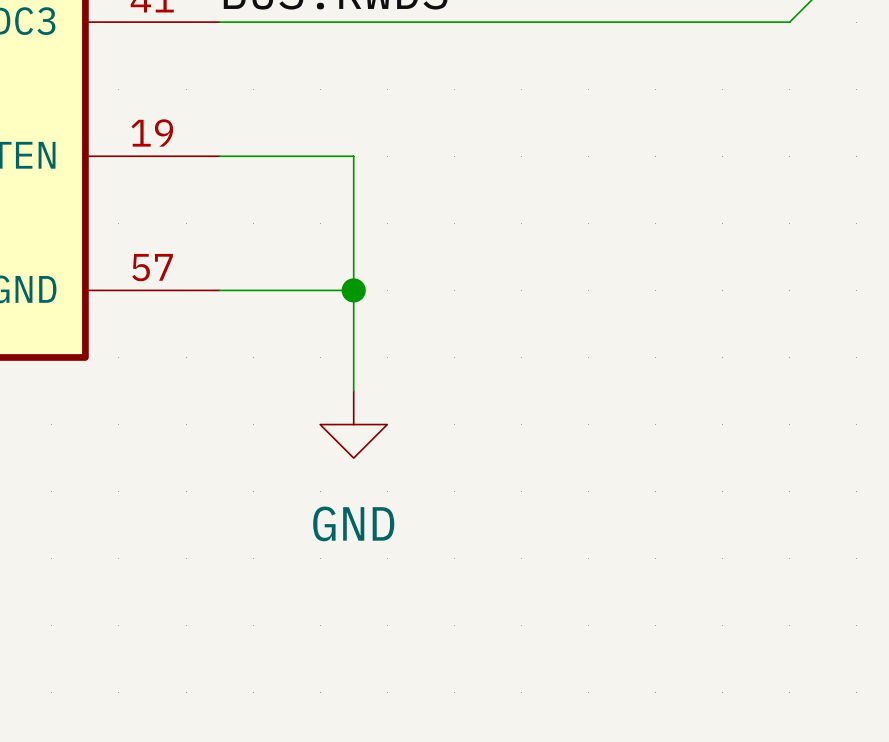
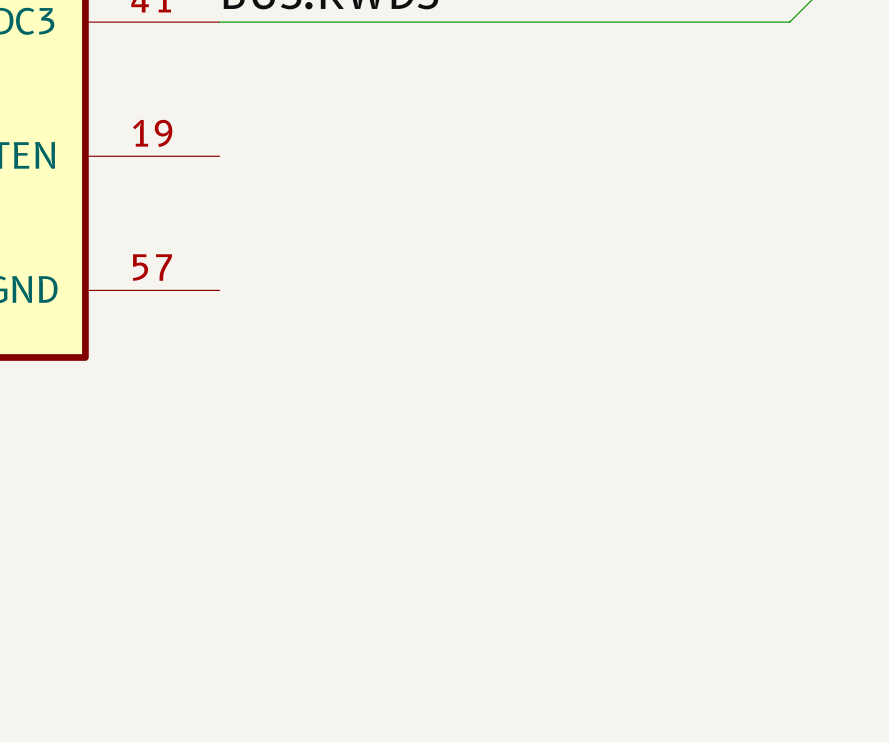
wire: (219, 156) (353, 156) (353, 391) -> none
wire: (219, 290) (353, 290) -> none
junction: (353, 290) -> none
power symbol: GND (353, 424) -> none

